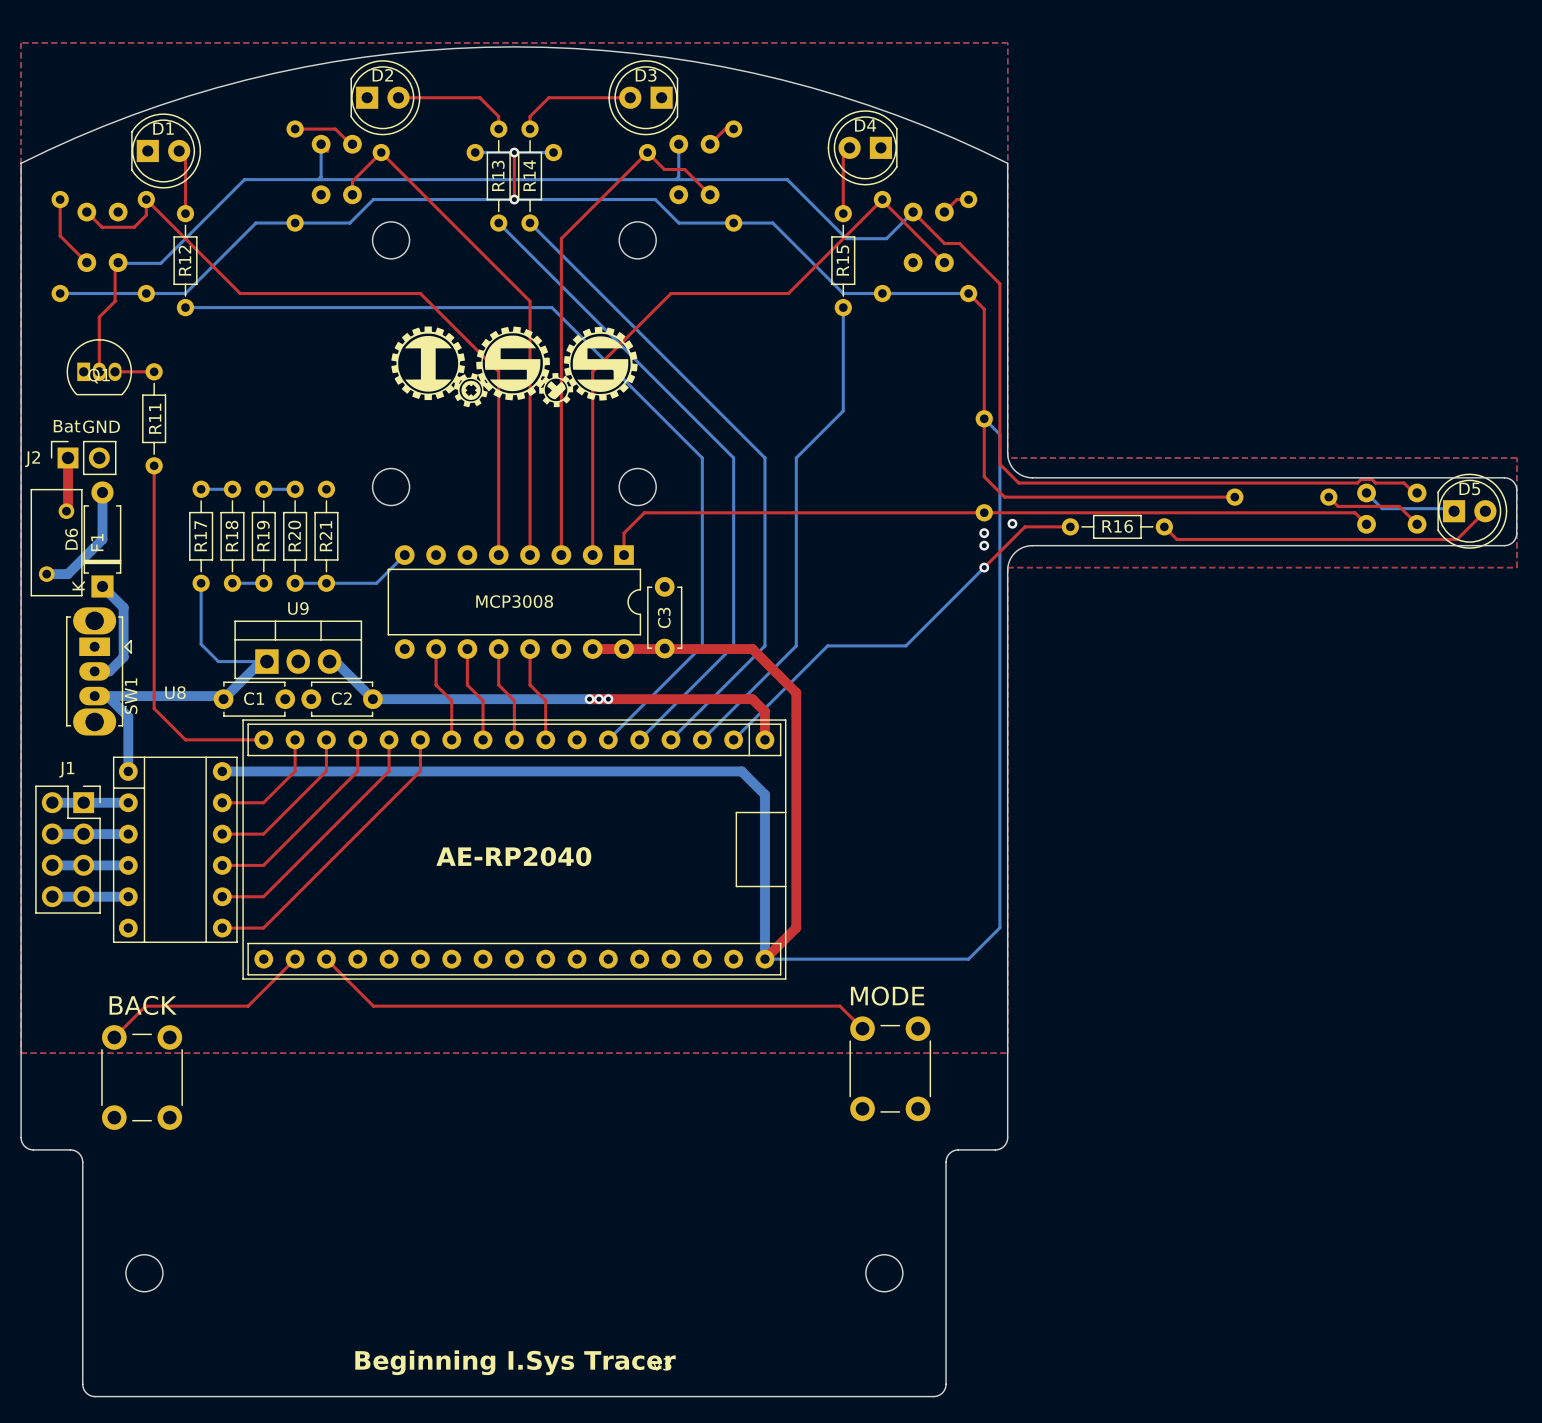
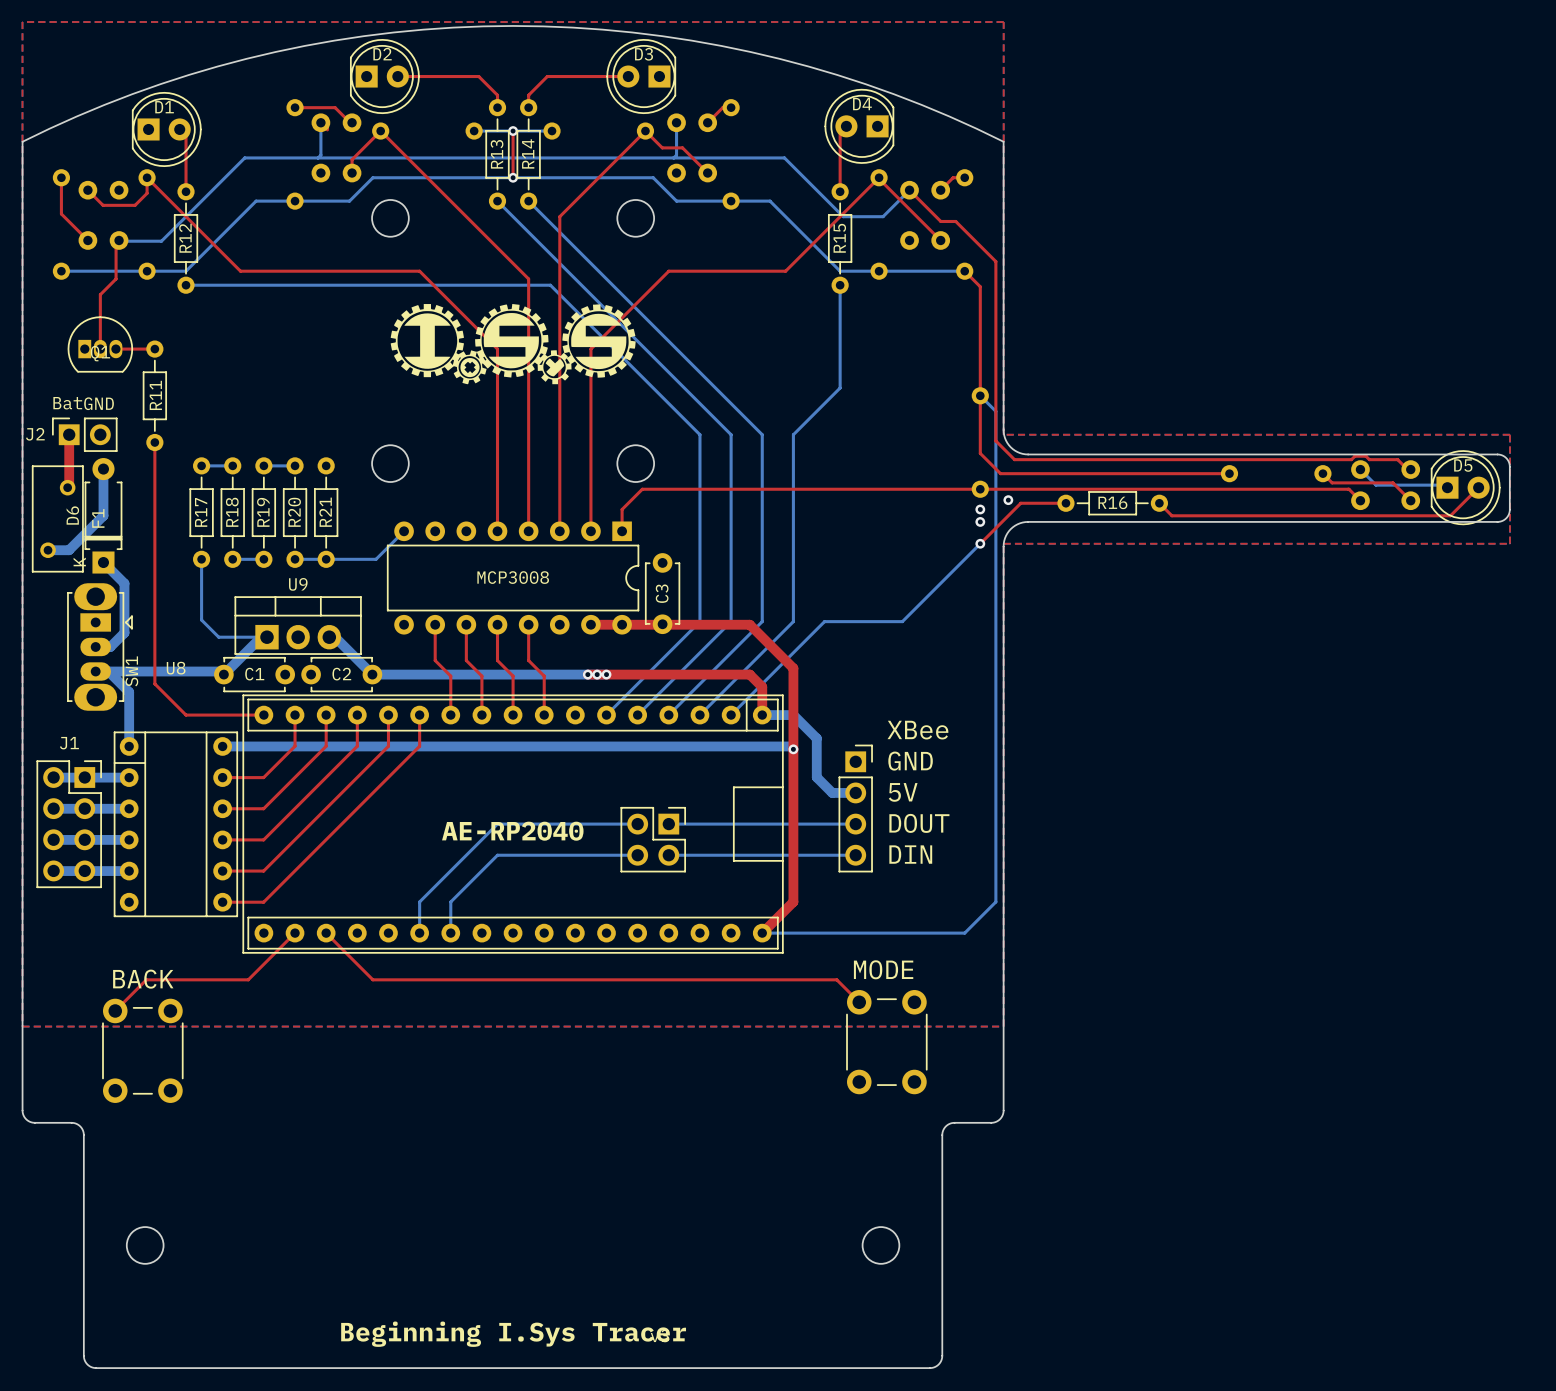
bottom track: none -> (762, 715) (793, 715) (816, 738) (816, 777) (832, 792) (855, 792)
text: none -> XBee (917, 730)
bottom track: (741, 771) (764, 794) (764, 959) -> (739, 746) (790, 746) (793, 749)
via: none -> (793, 749)
text: none -> GND (910, 761)
text: none -> 5V (903, 792)
part: none -> (855, 808)
text: none -> DOUT (919, 823)
bottom track: none -> (637, 824) (497, 824) (419, 901) (419, 933)
bottom track: none -> (668, 824) (855, 824)
part: none -> (653, 839)
bottom track: none -> (637, 855) (497, 855) (450, 901) (450, 933)
bottom track: none -> (668, 855) (855, 855)
text: none -> DIN (910, 854)

